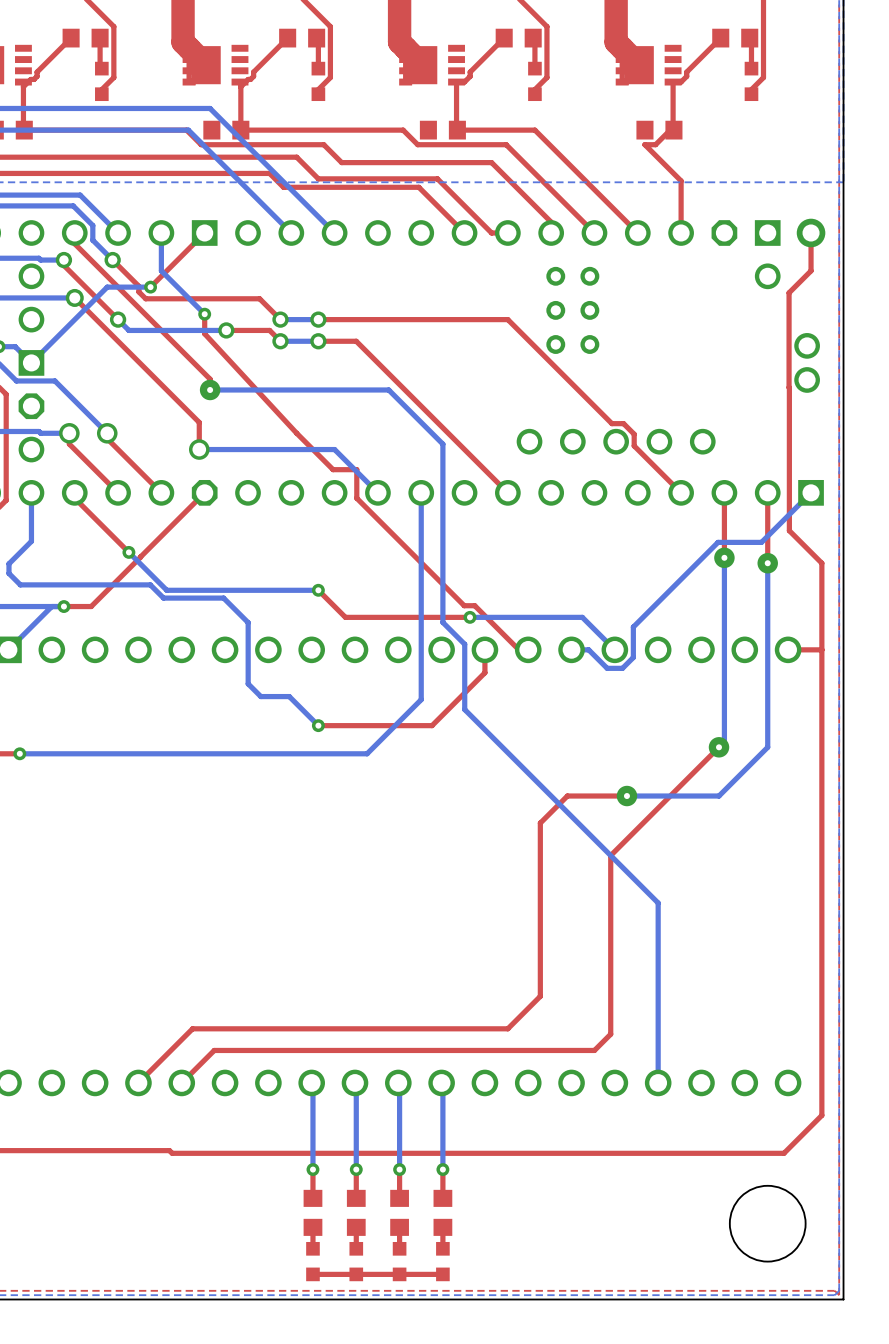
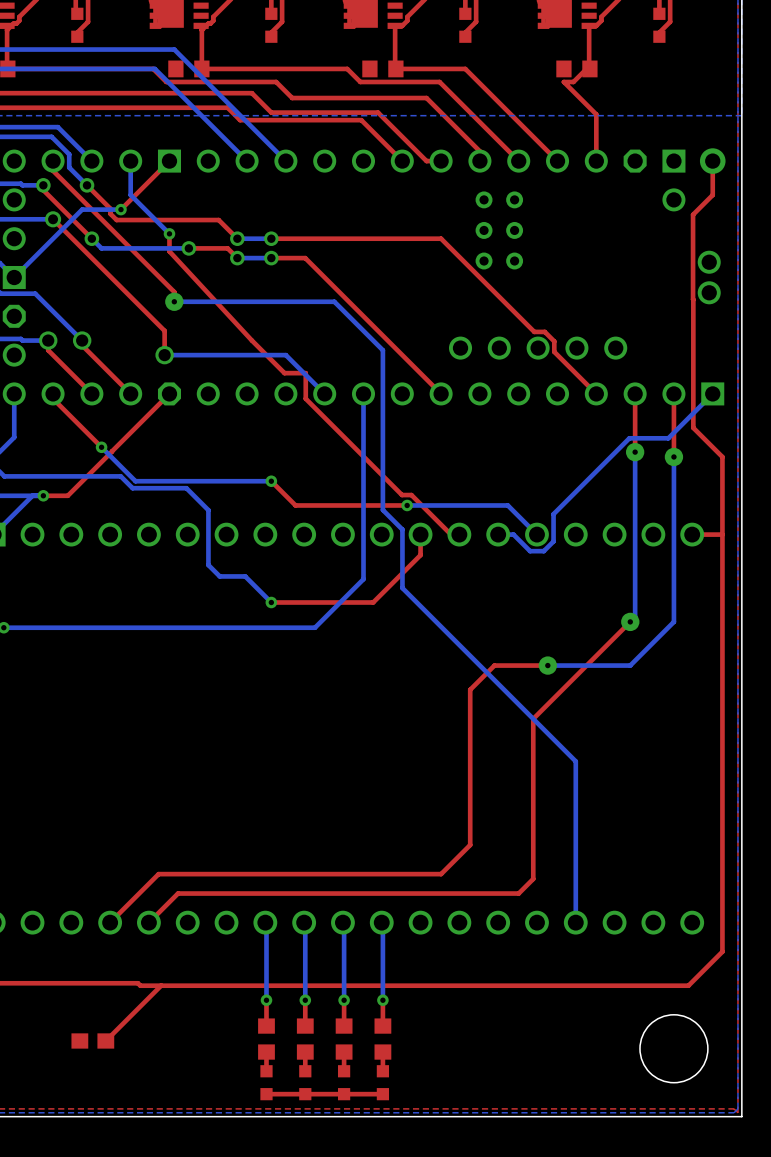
top track: none -> (161, 985) (105, 1040)
part: none -> (92, 1040)

